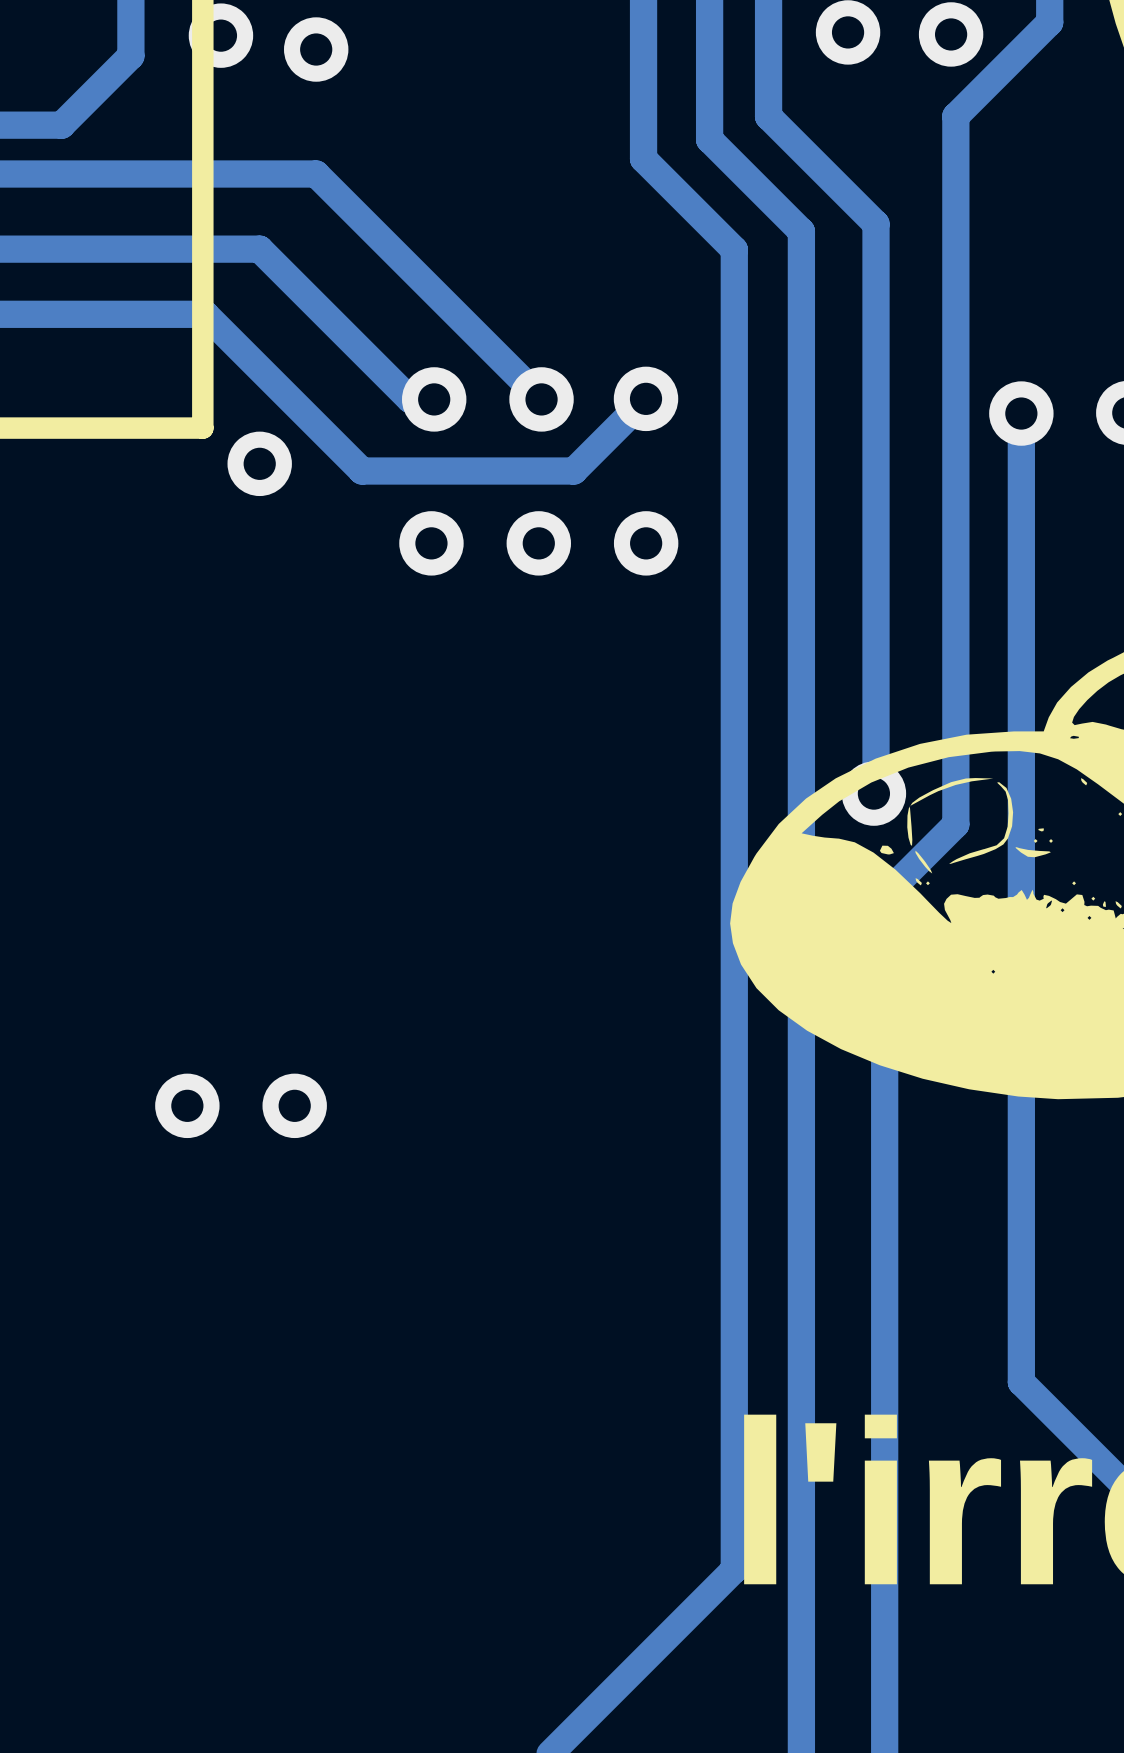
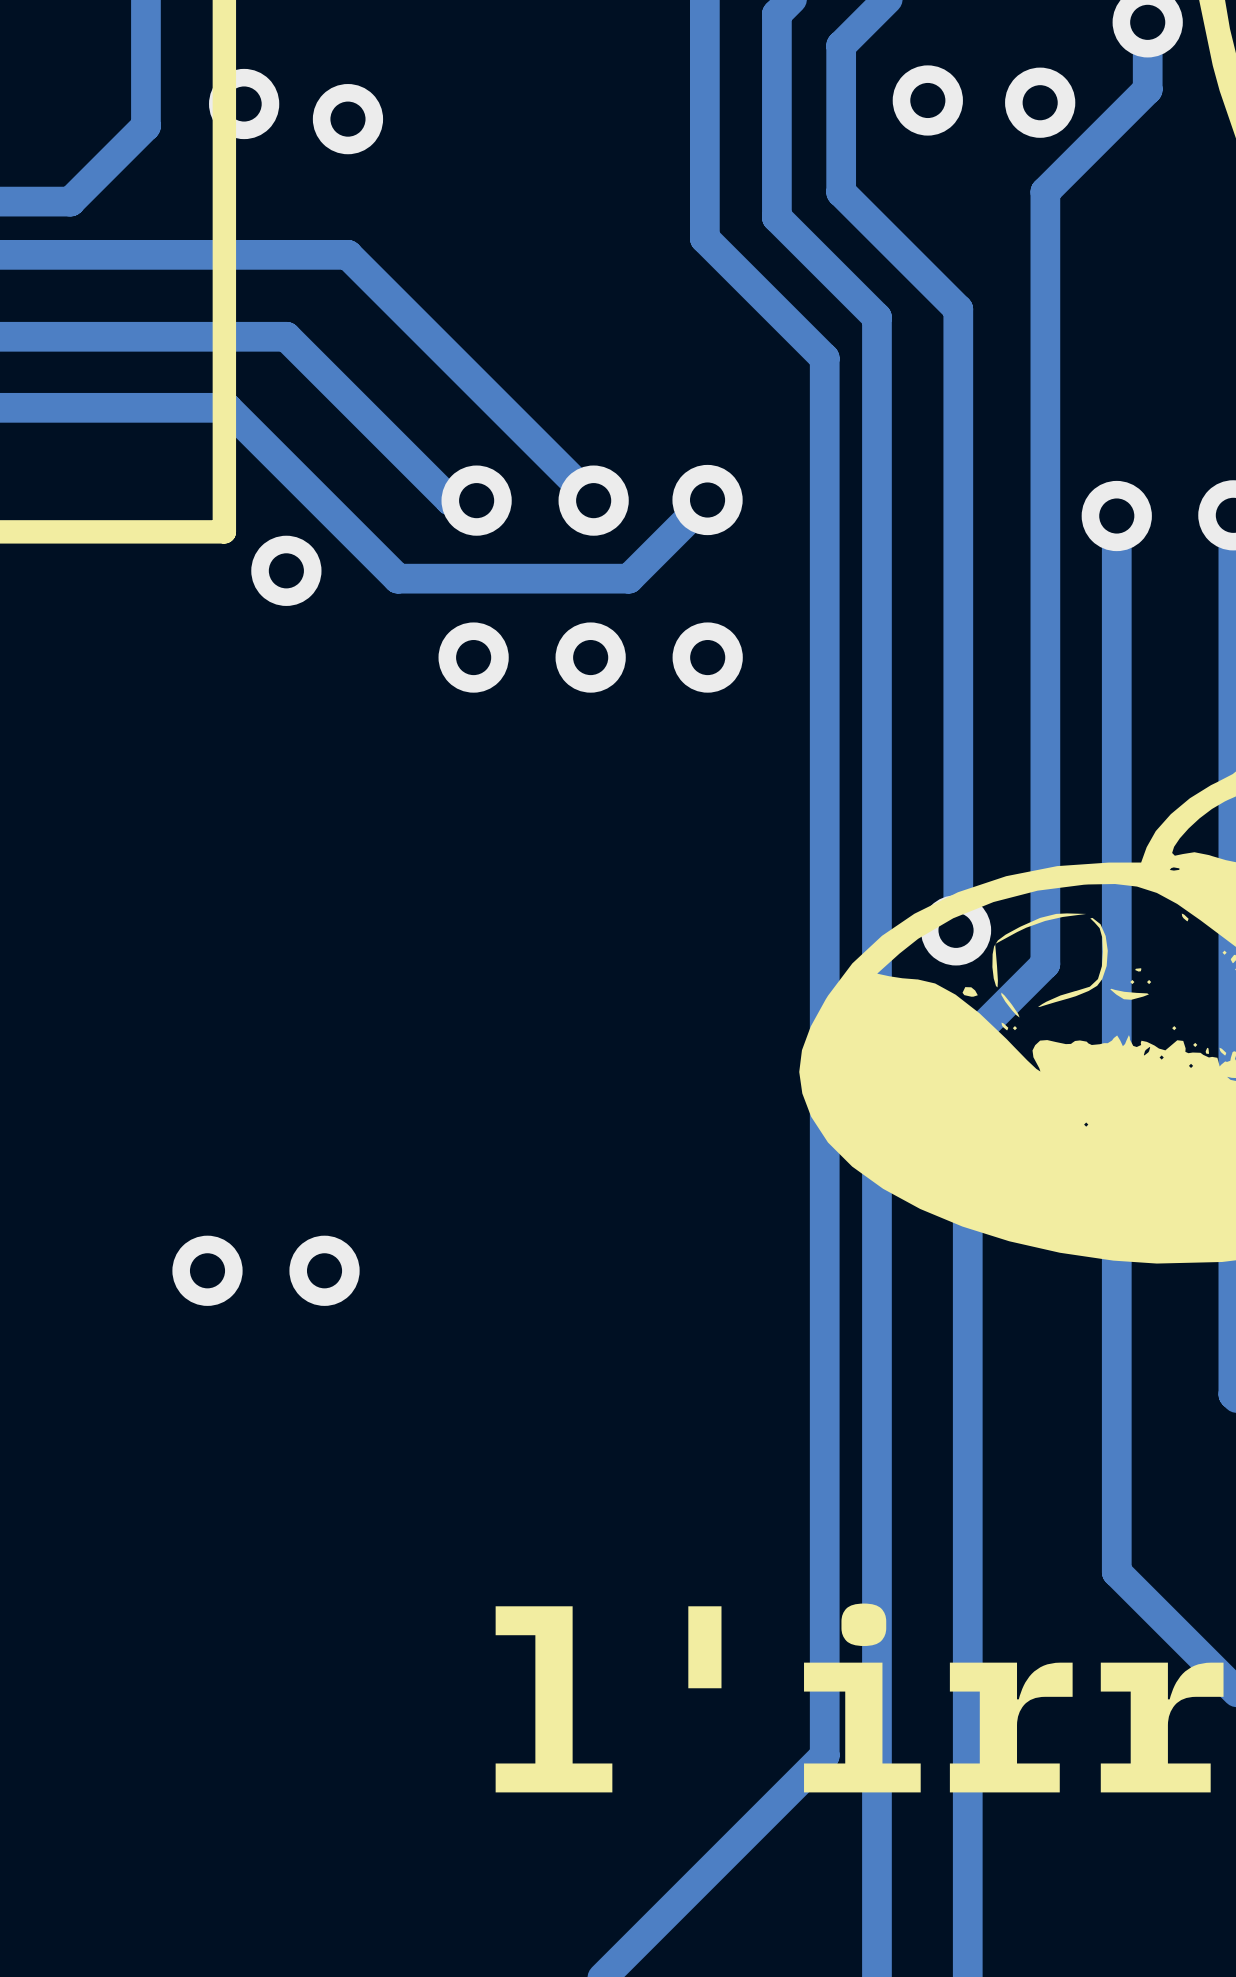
track: (734, 249) (734, 1569) -> (803, 337) (824, 358) (824, 1755) (803, 1776)

